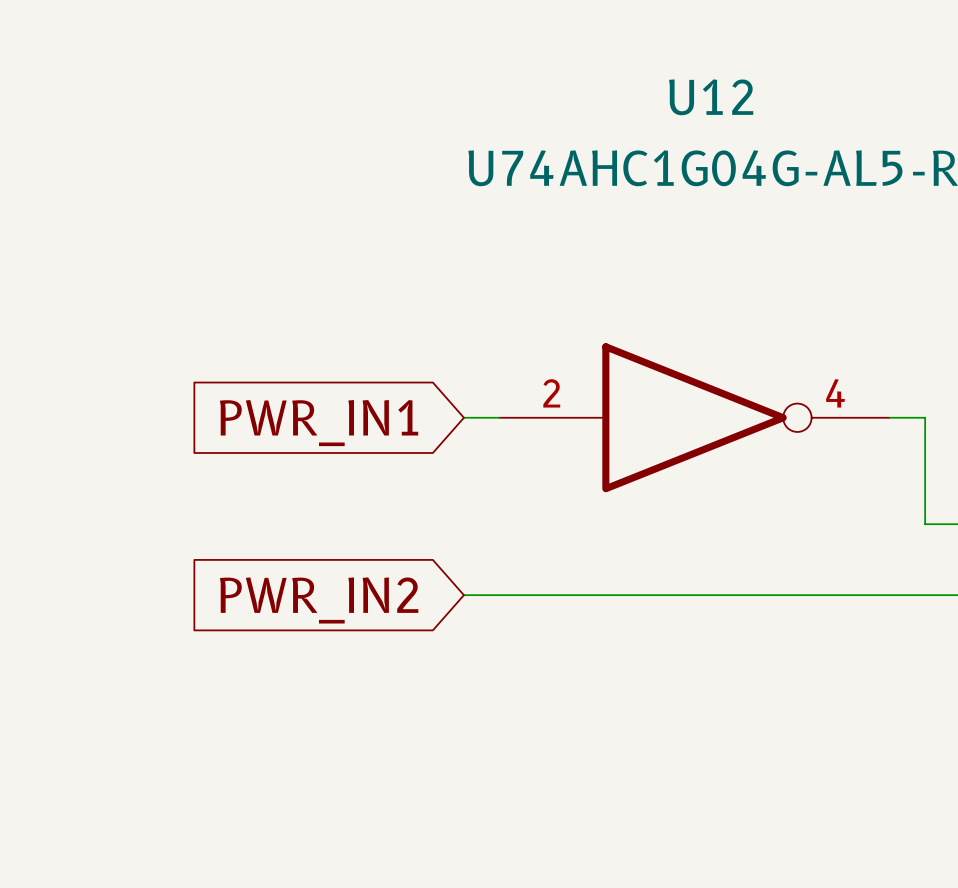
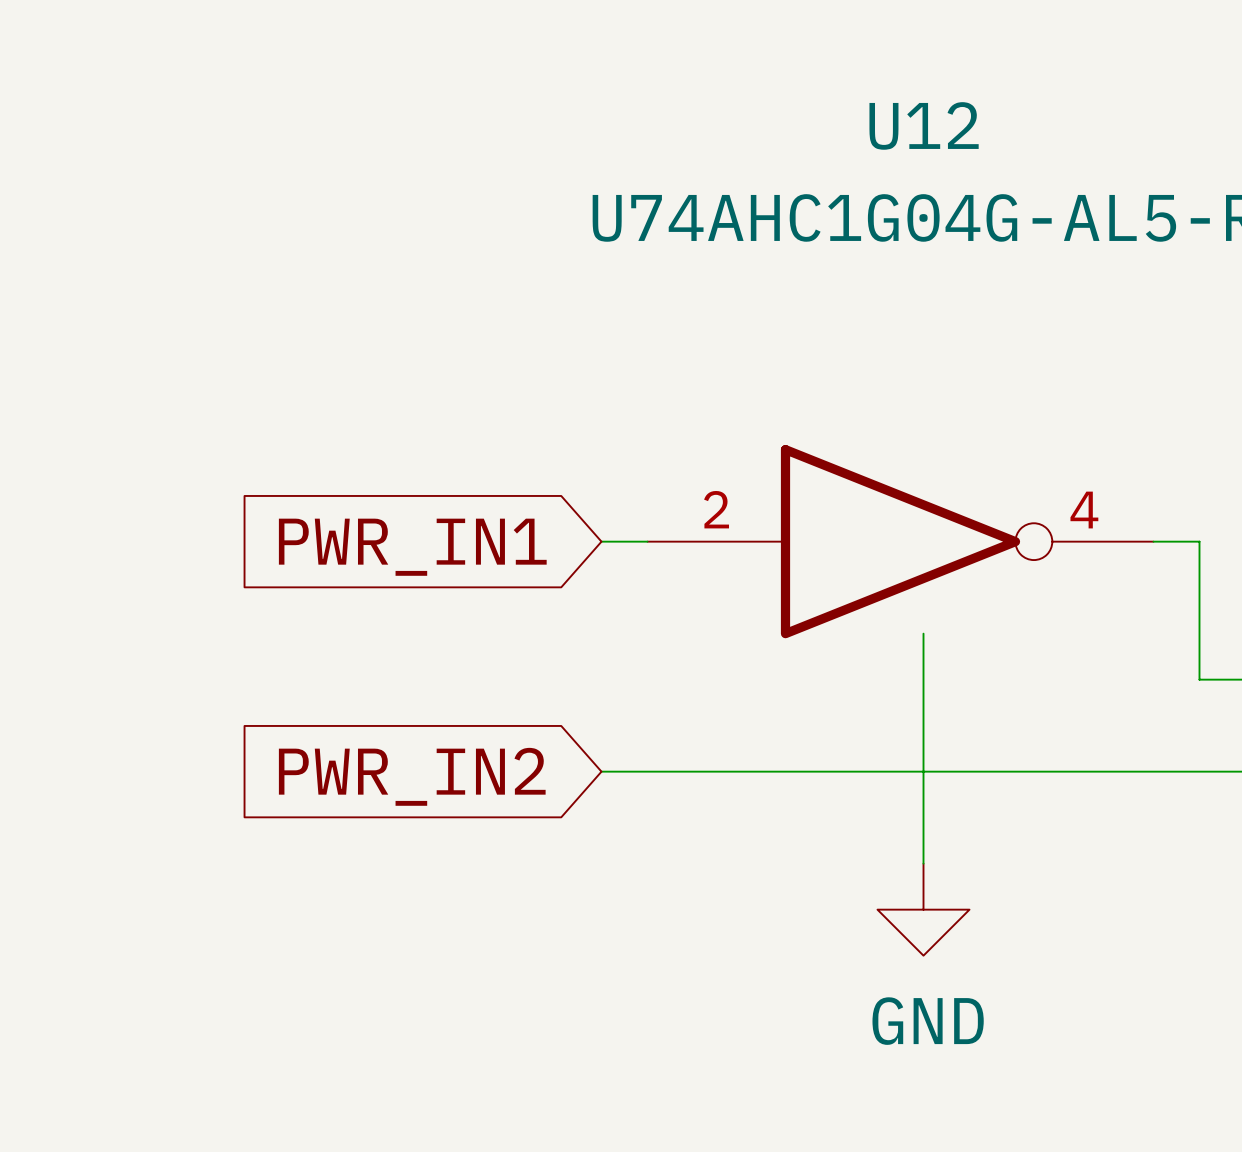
wire: none -> (923, 633) (923, 863)
power symbol: none -> GND (923, 909)

